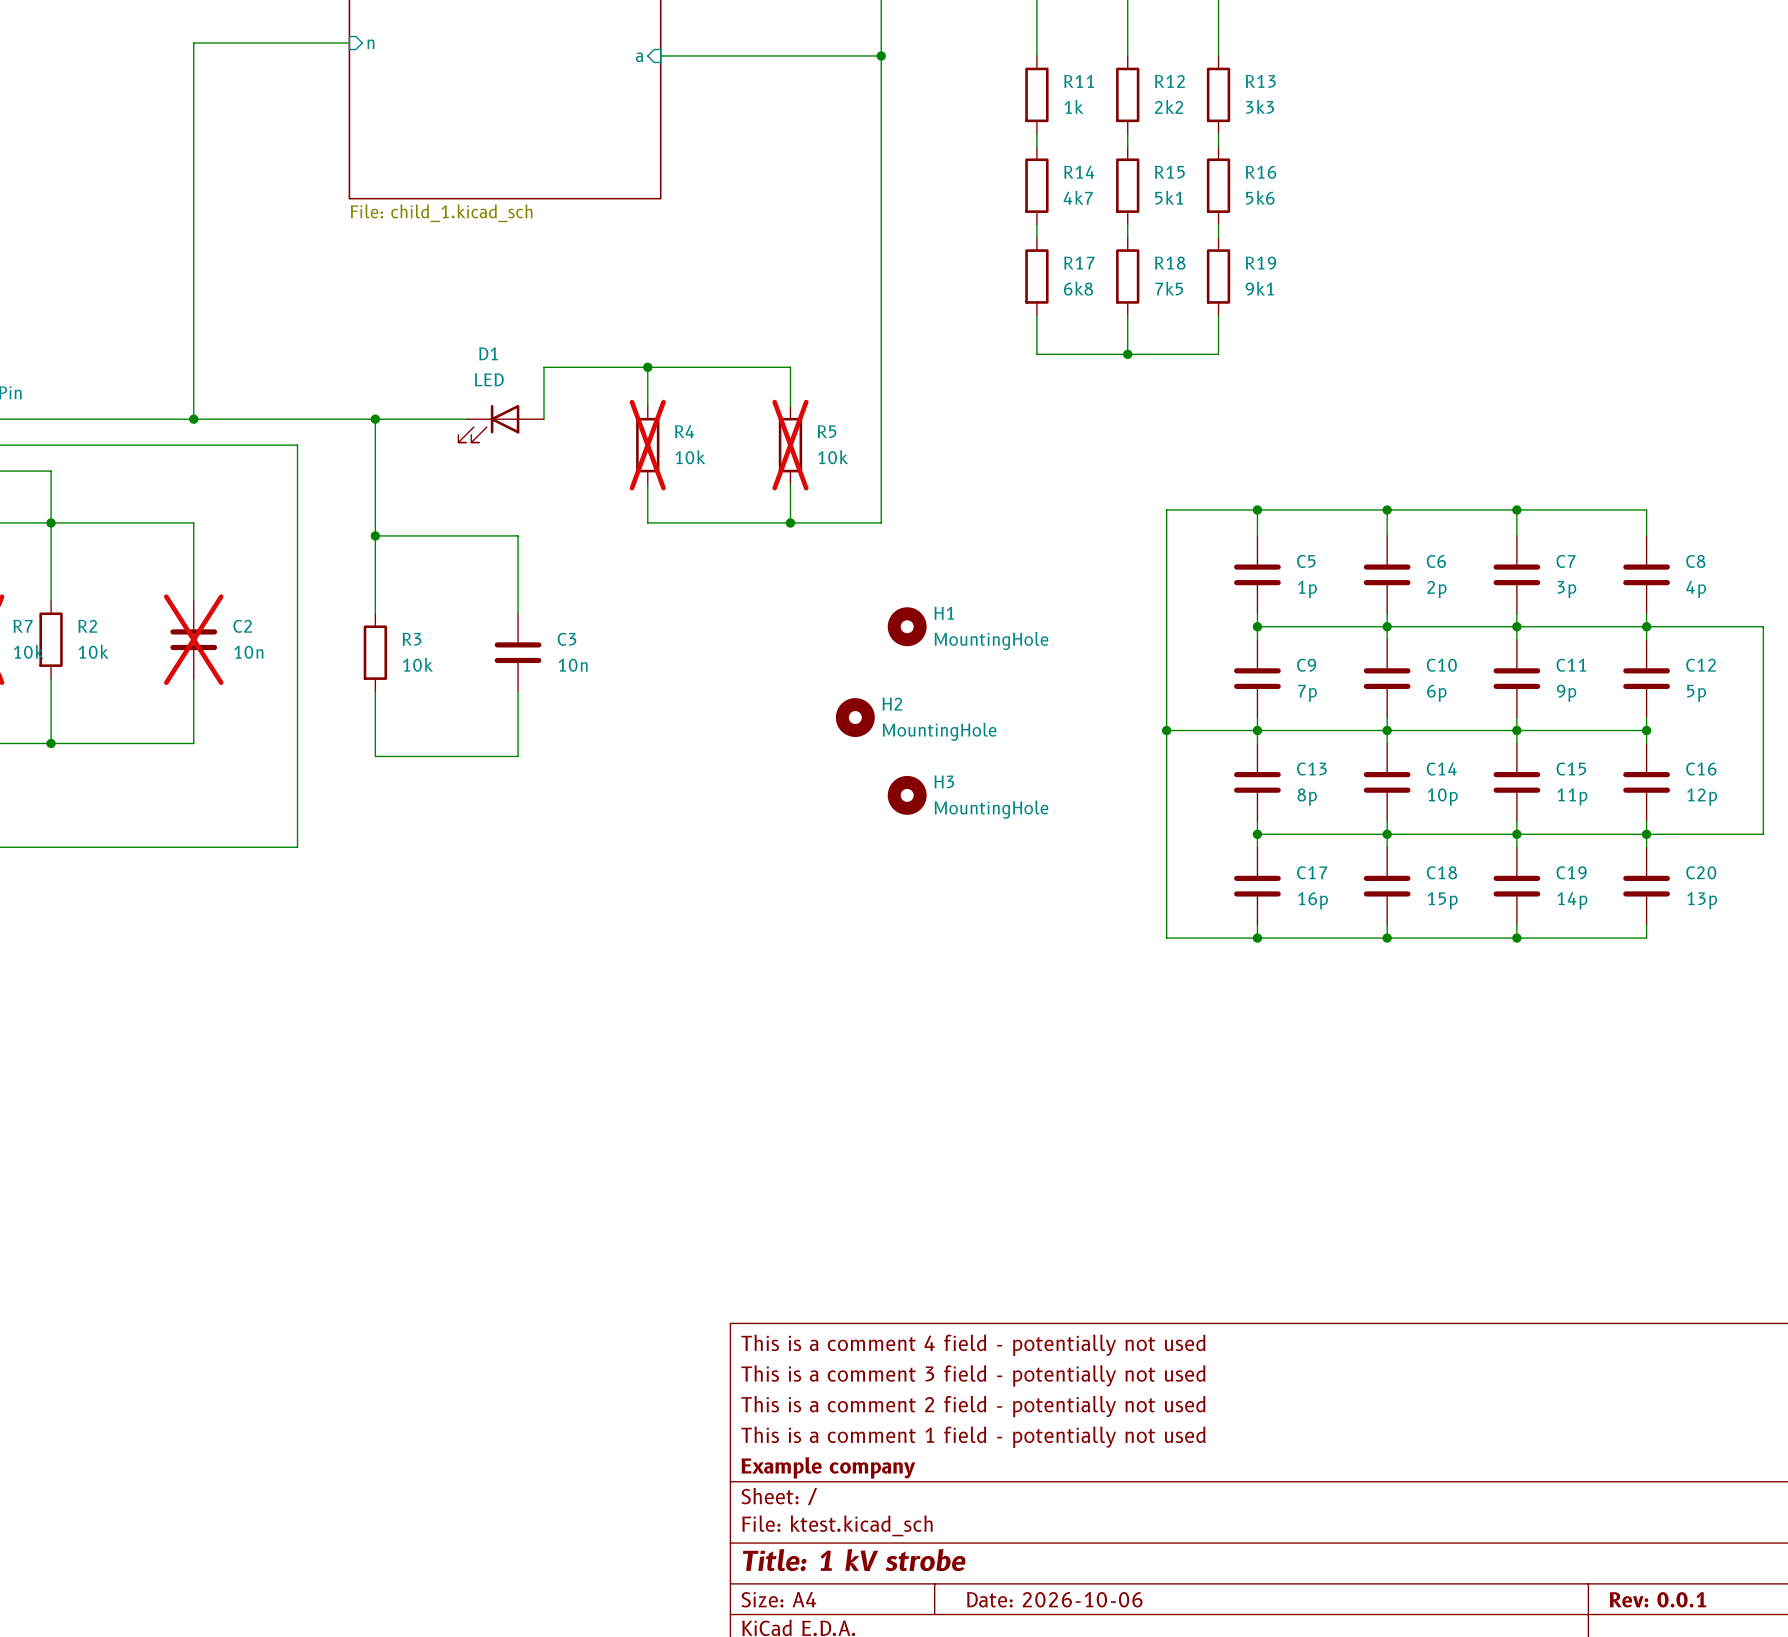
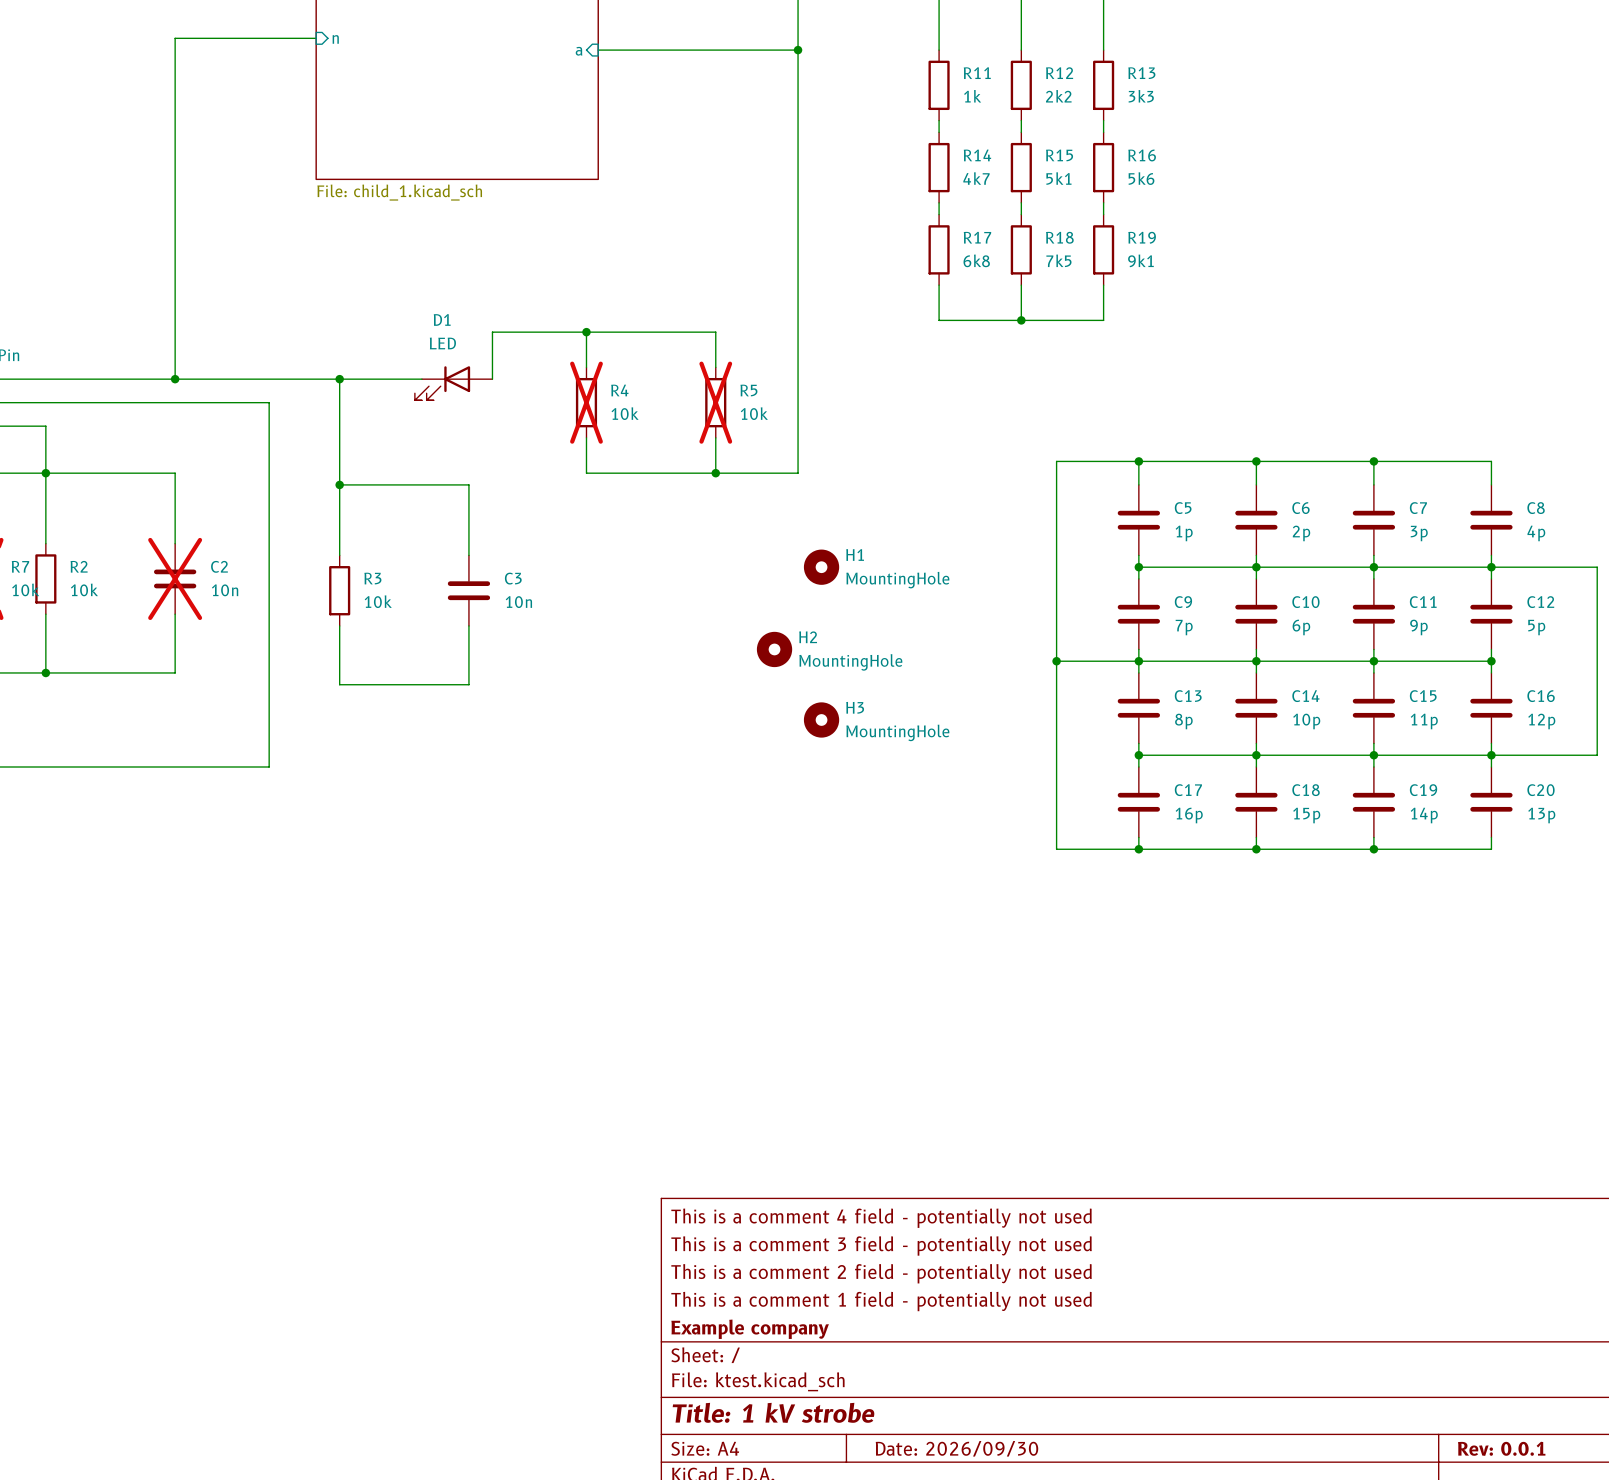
title block: Date: 2026-10-06 (1054, 1599) -> Date: 2026/09/30 (956, 1448)

